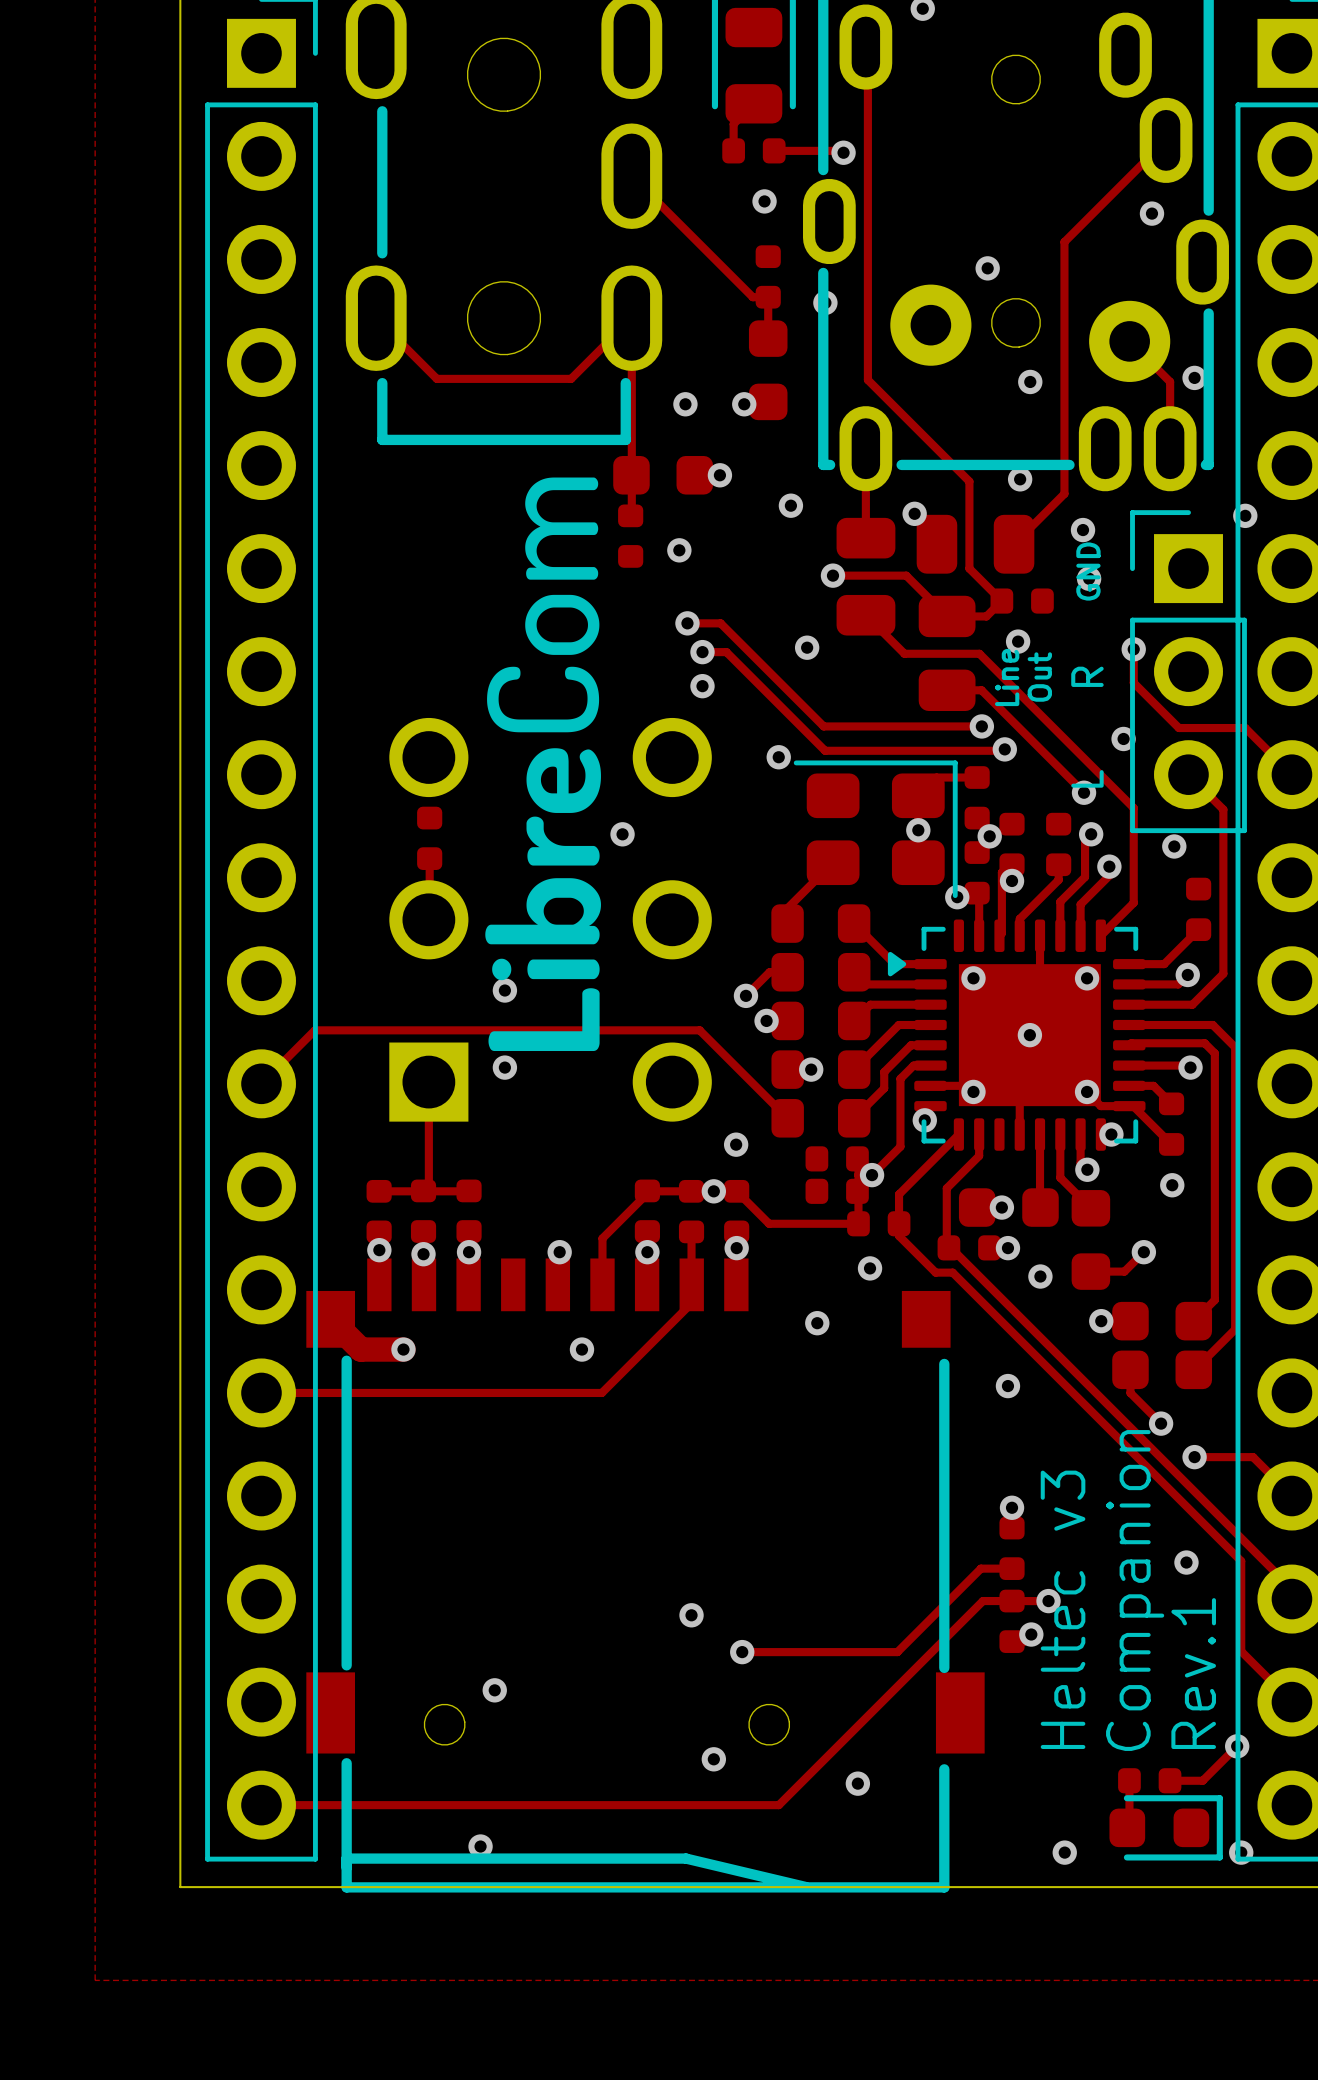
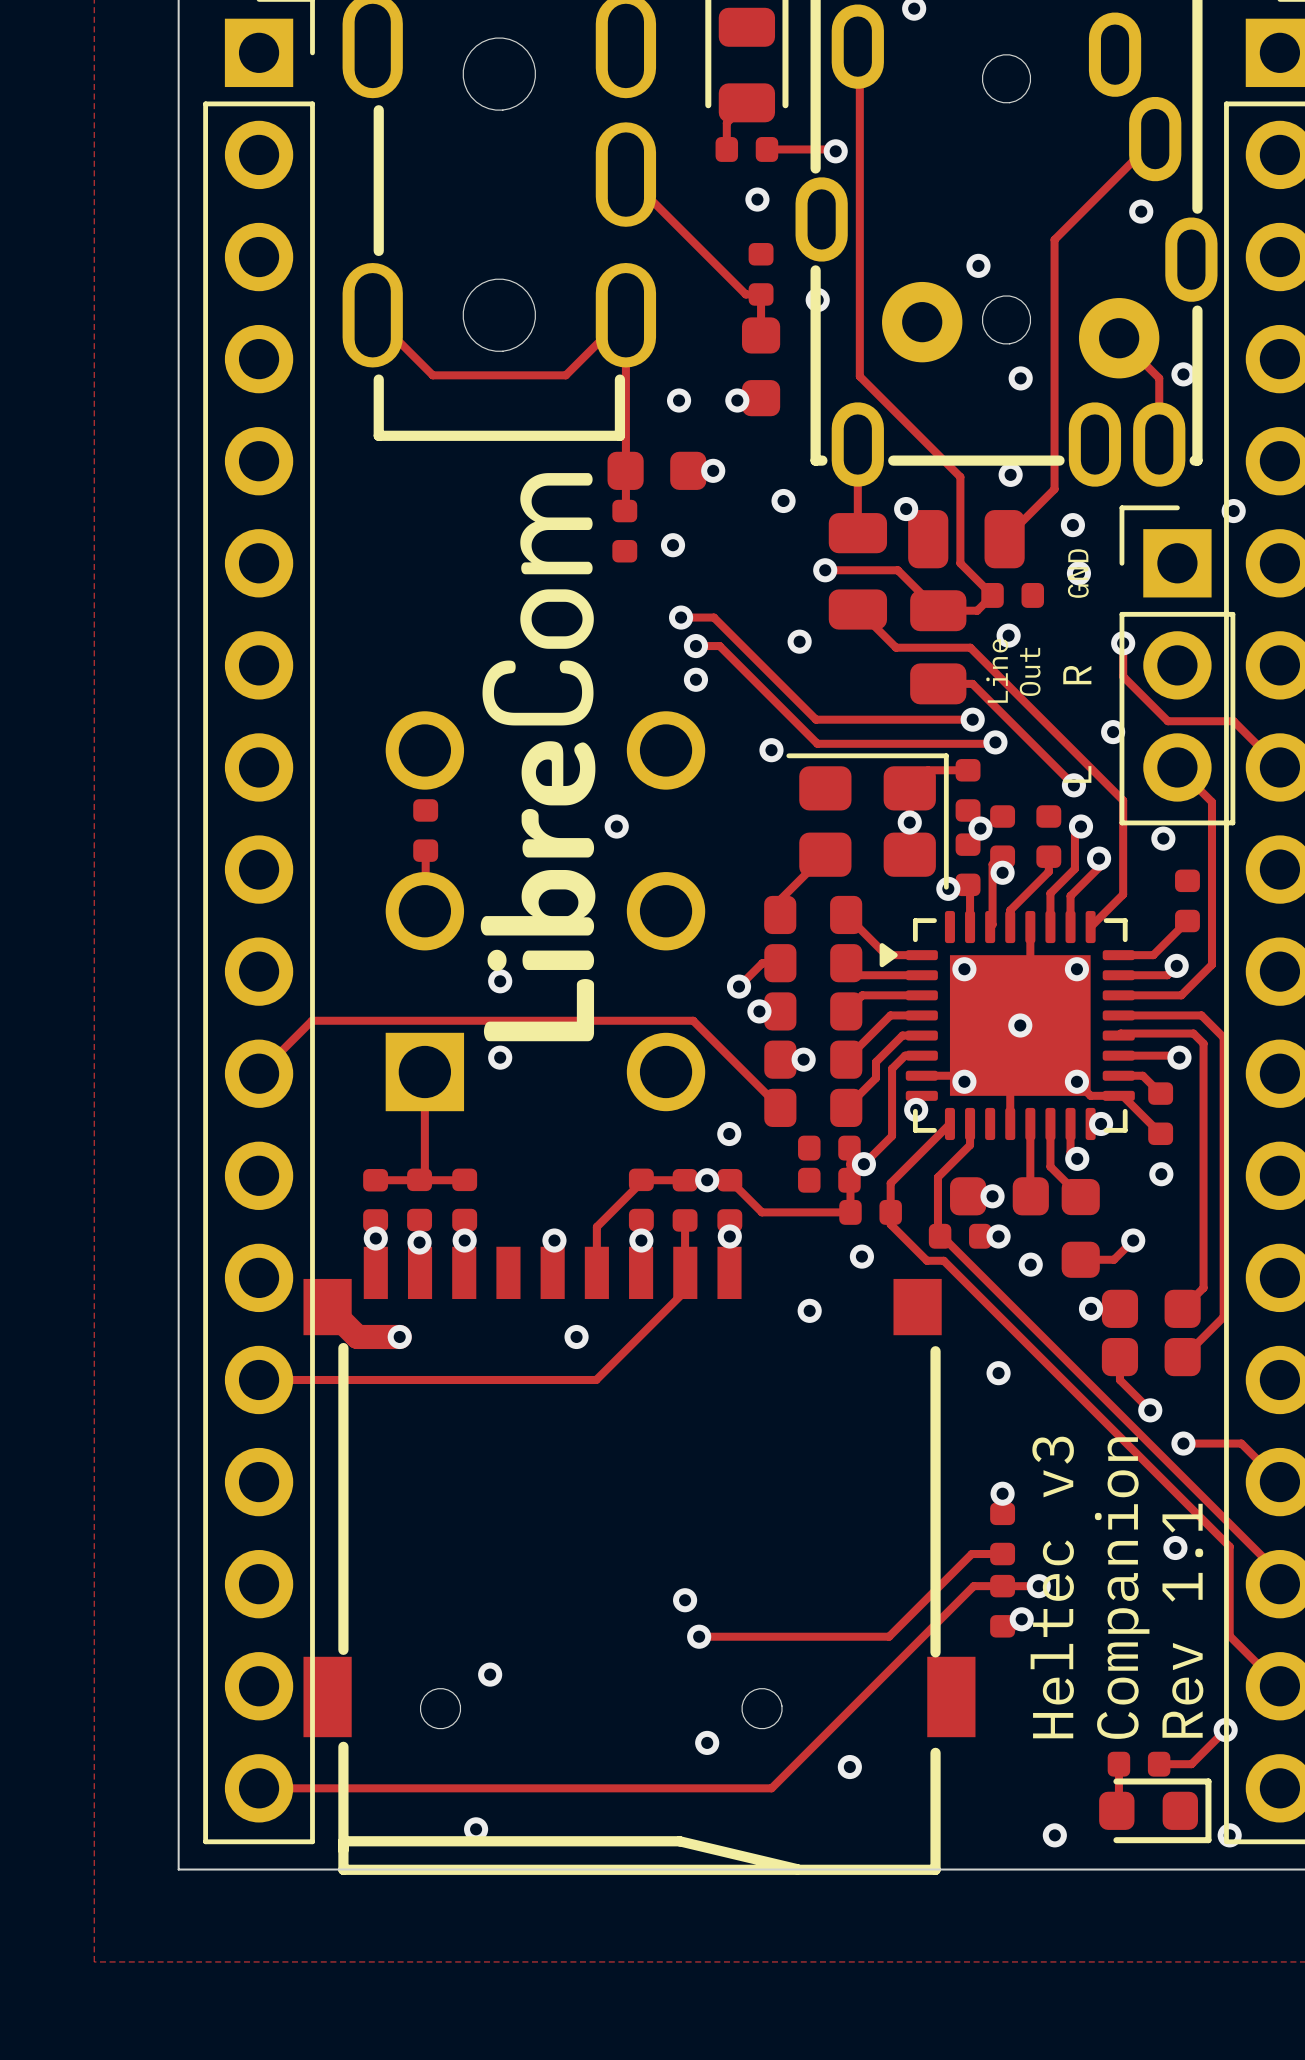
track: none -> (699, 1636) (735, 1636)
via position: (742, 1652) -> (699, 1636)
text: Rev.1 (1193, 1673) -> Rev 1.1 (1182, 1620)

